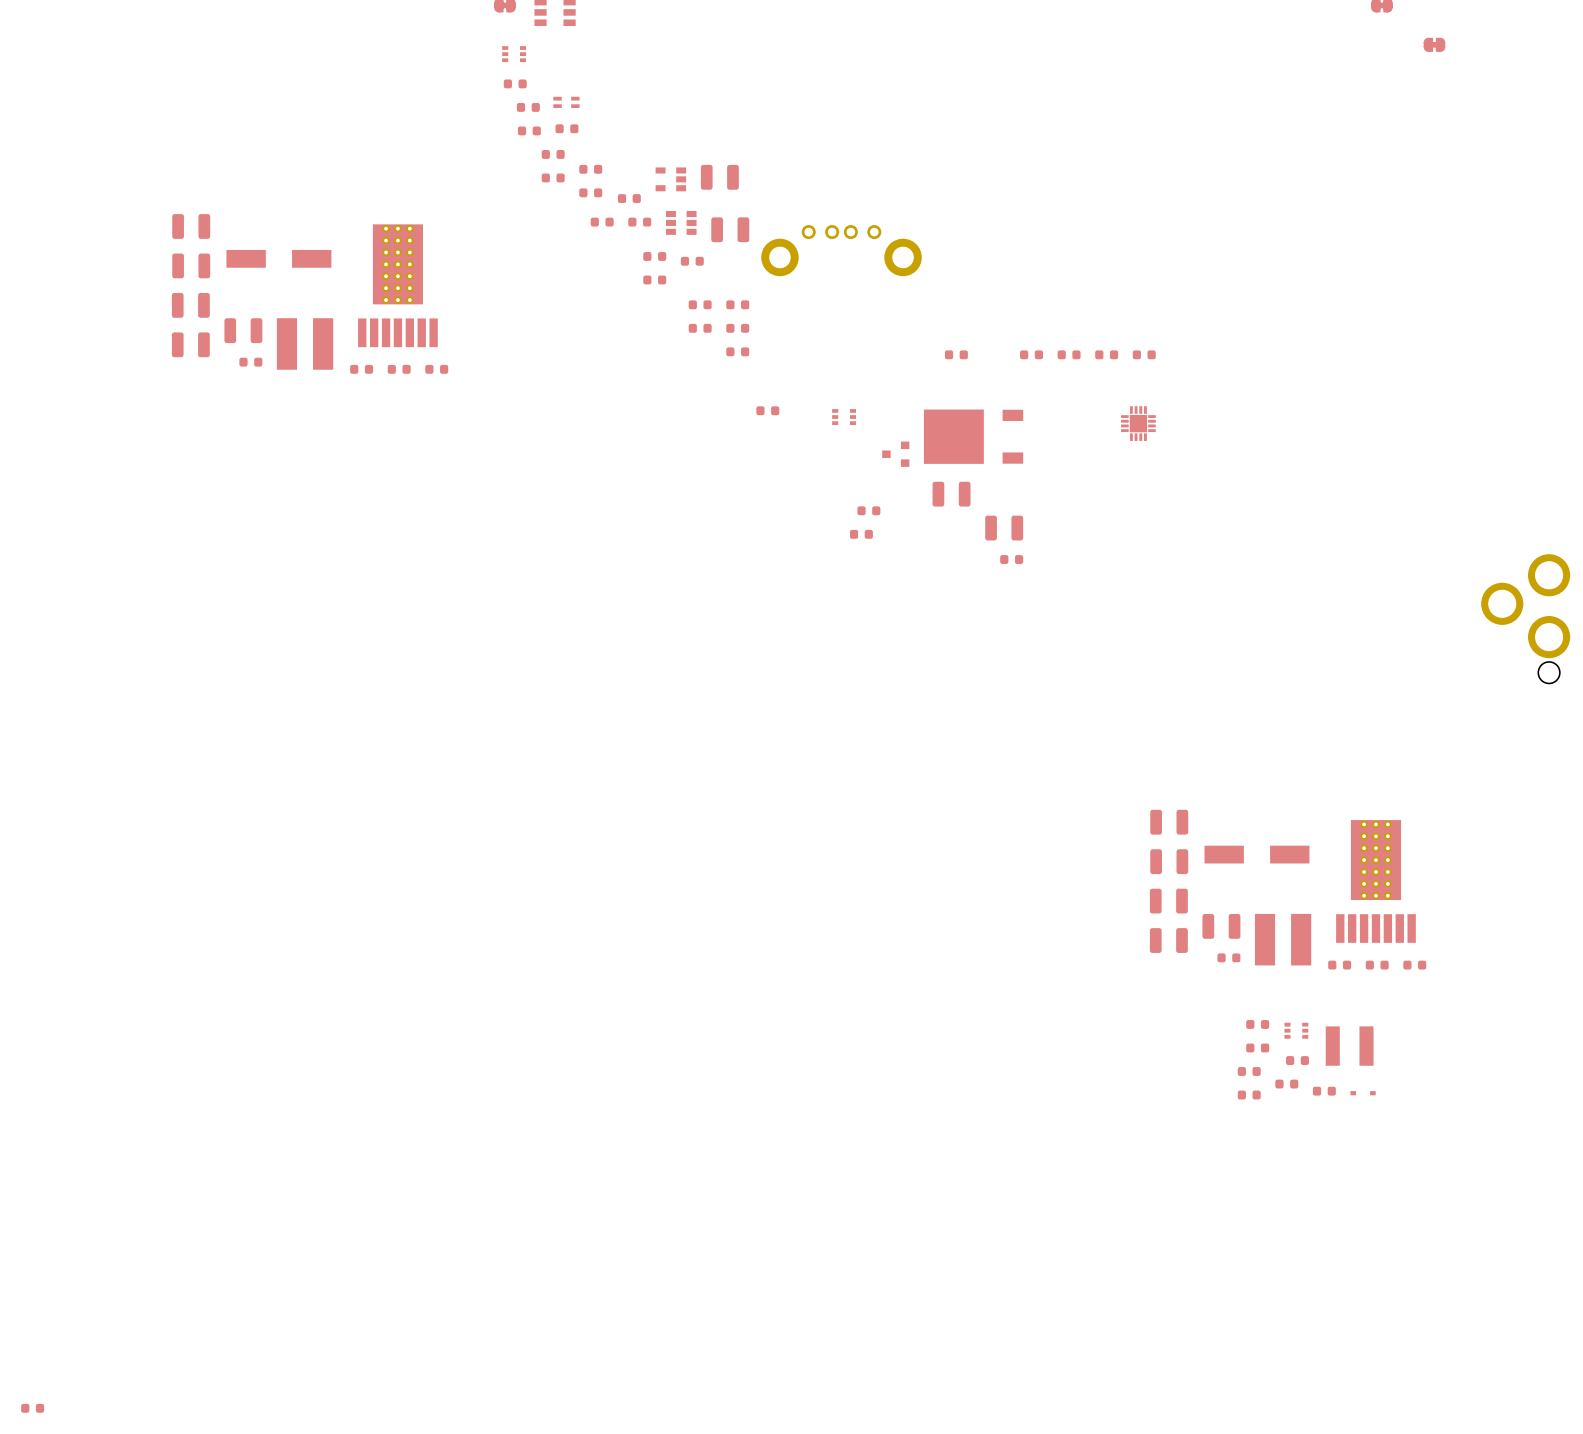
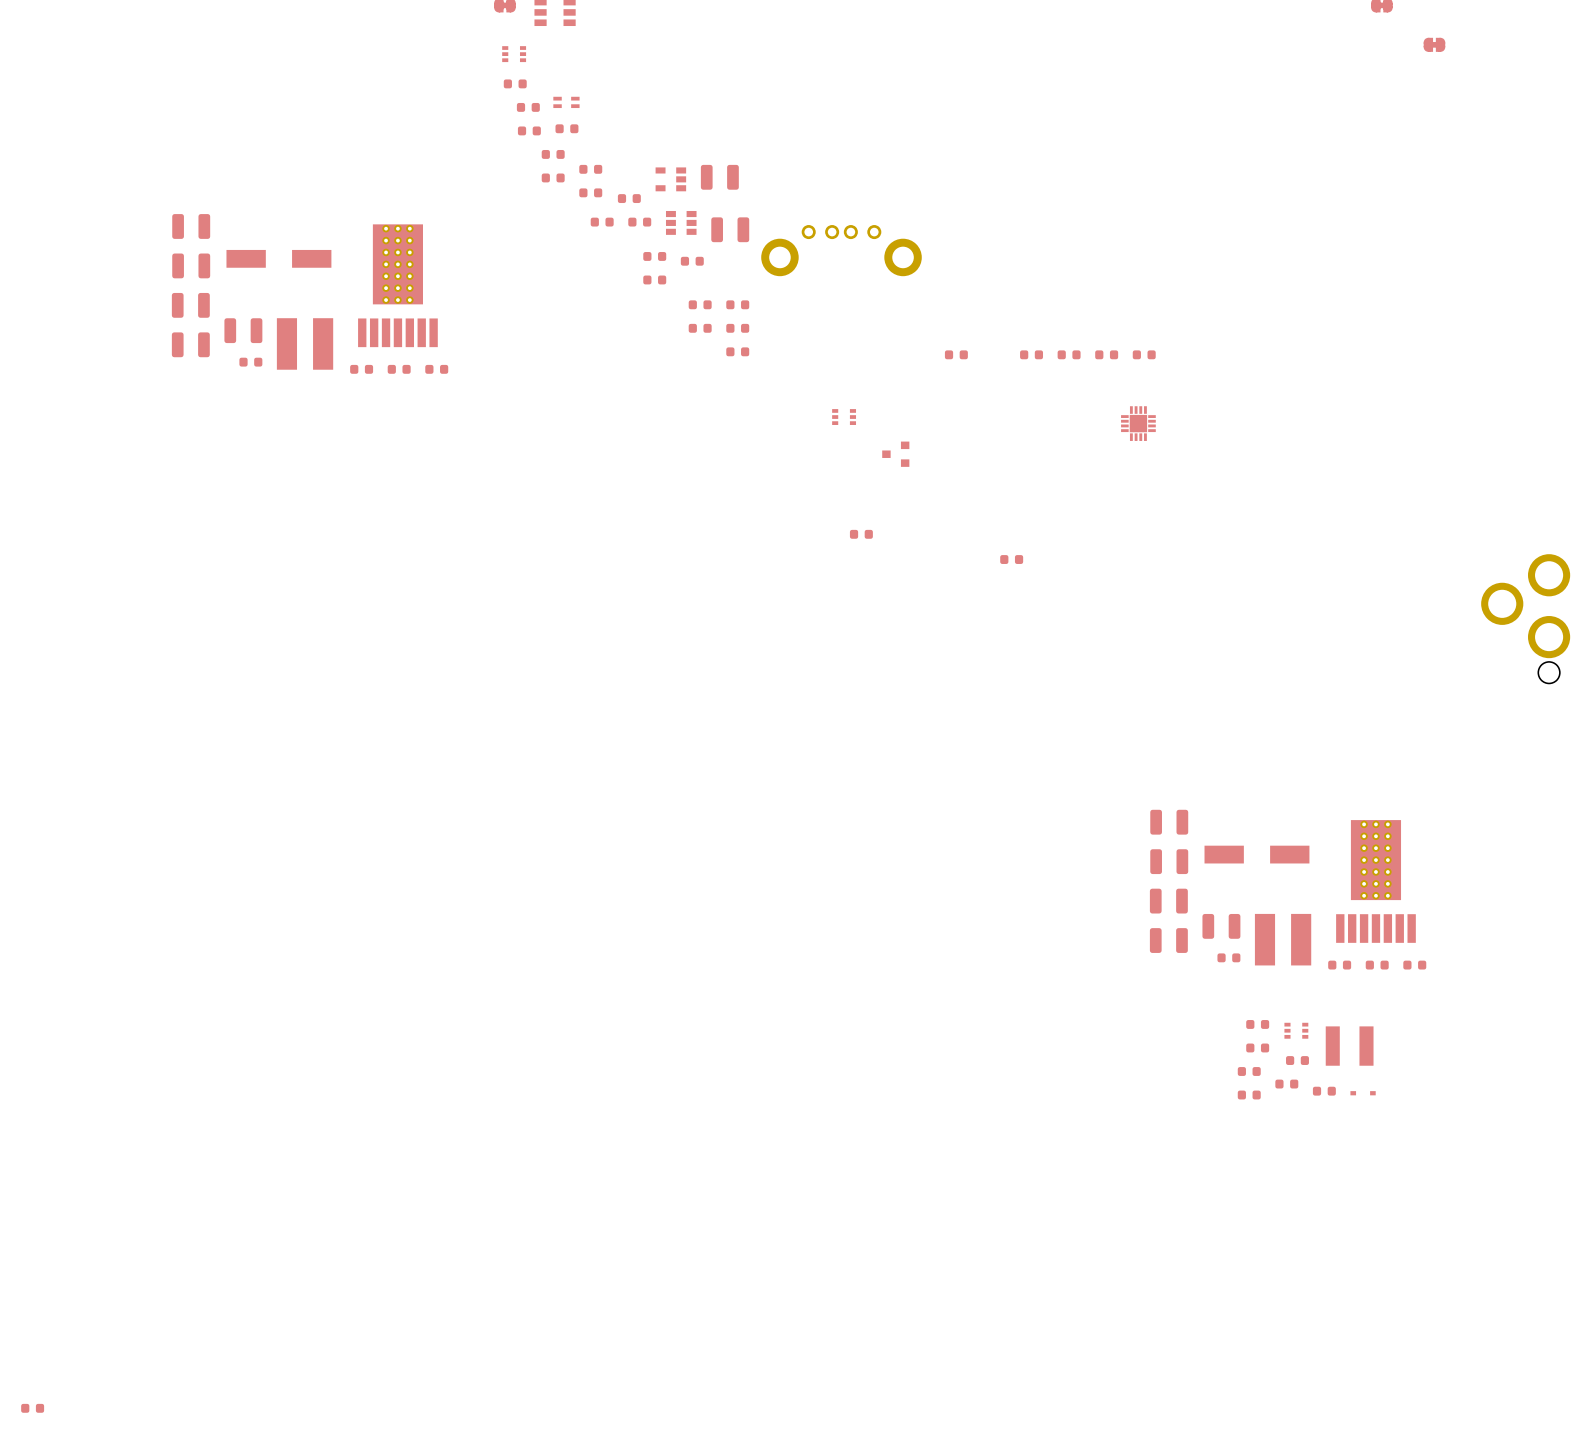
part: (767, 410) -> none
part: (973, 436) -> none
part: (951, 494) -> none
part: (868, 510) -> none
part: (1004, 528) -> none

